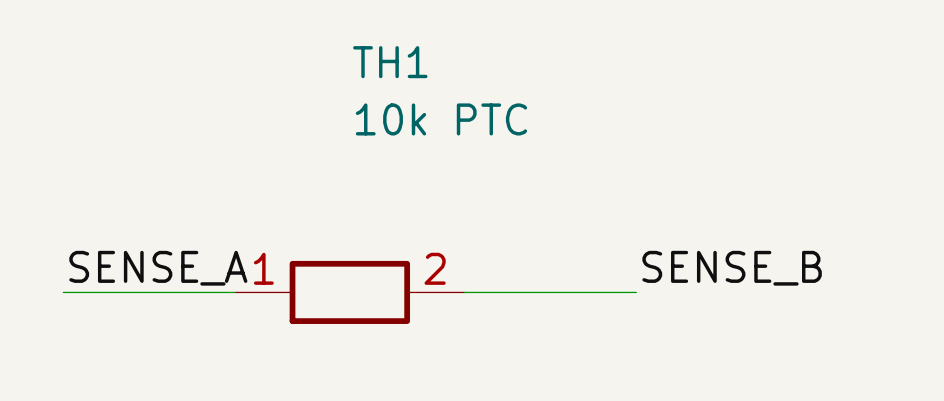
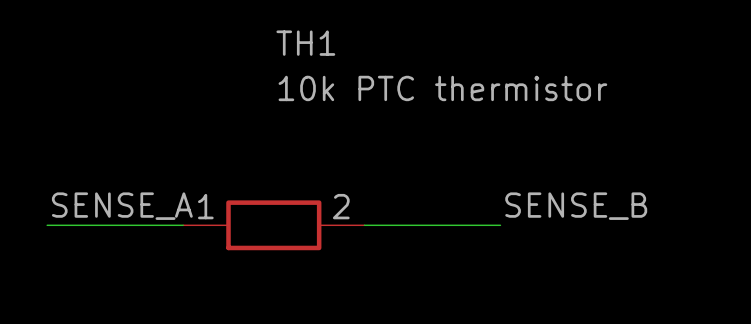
TH1 value: 10k PTC (441, 119) -> 10k PTC thermistor (442, 88)

